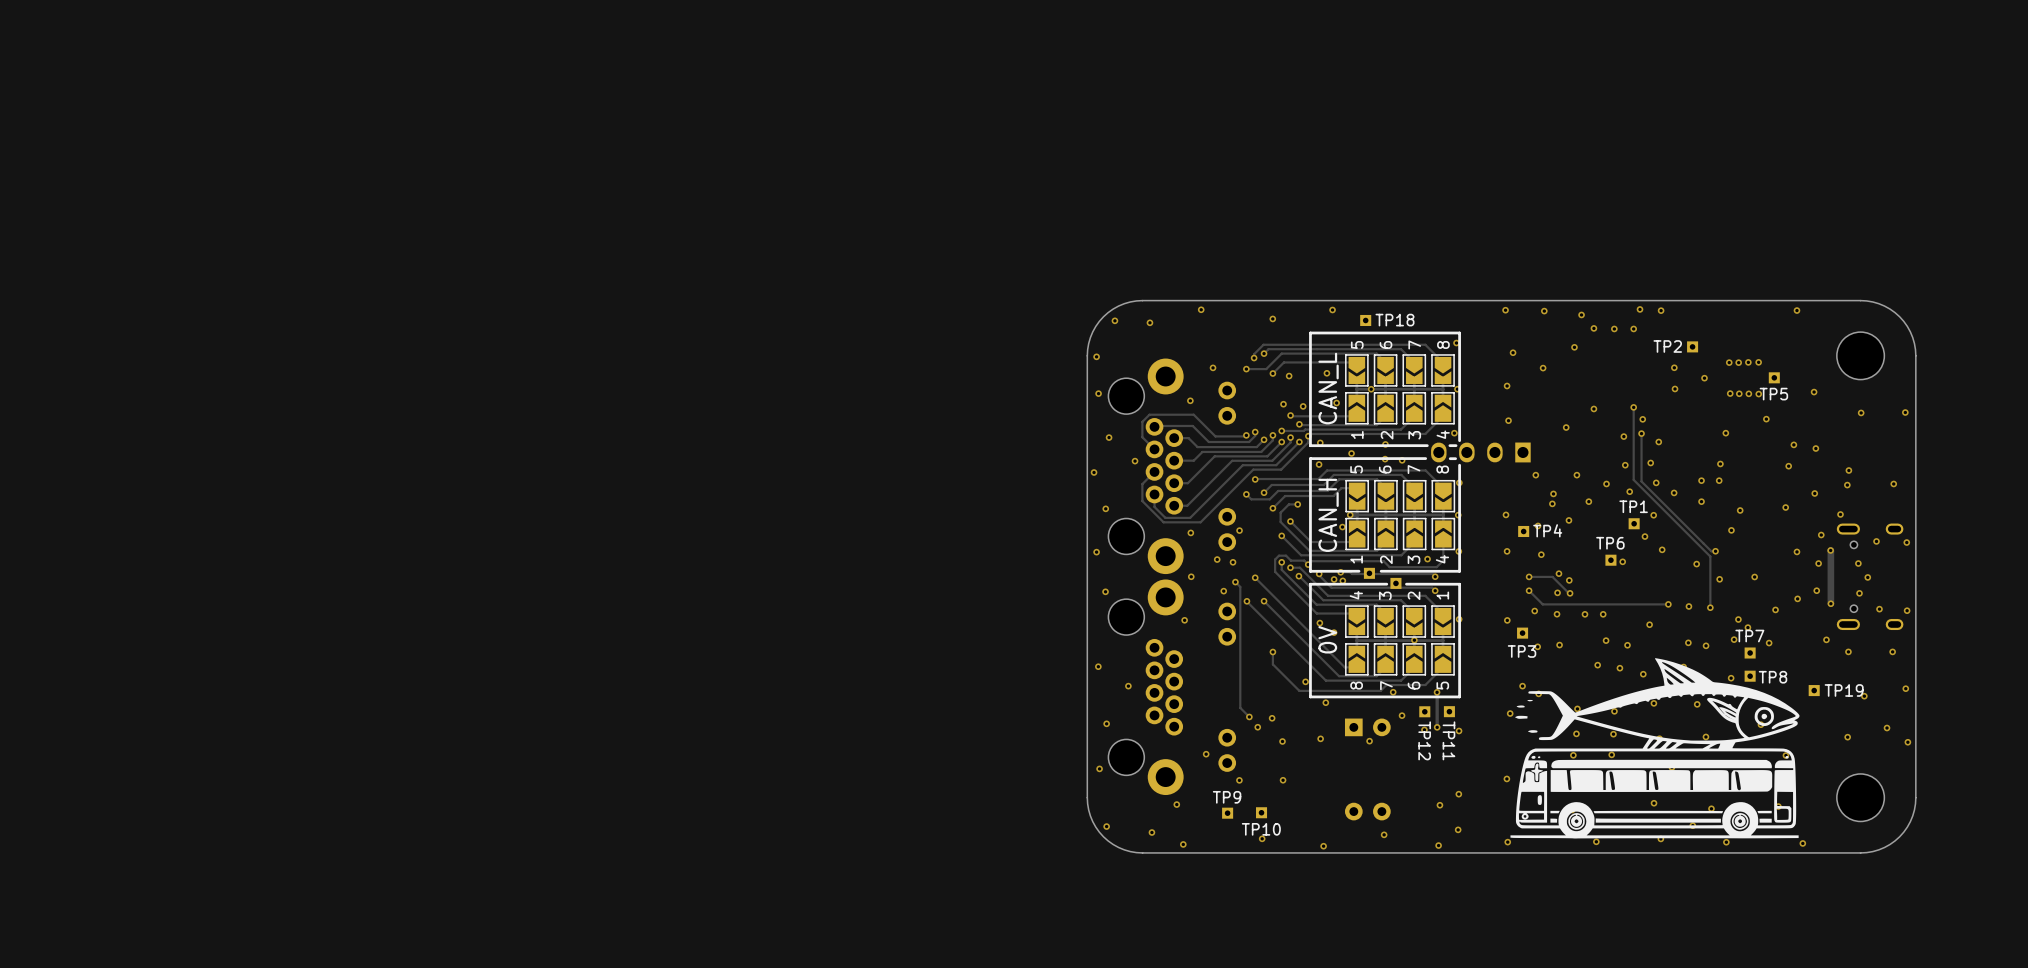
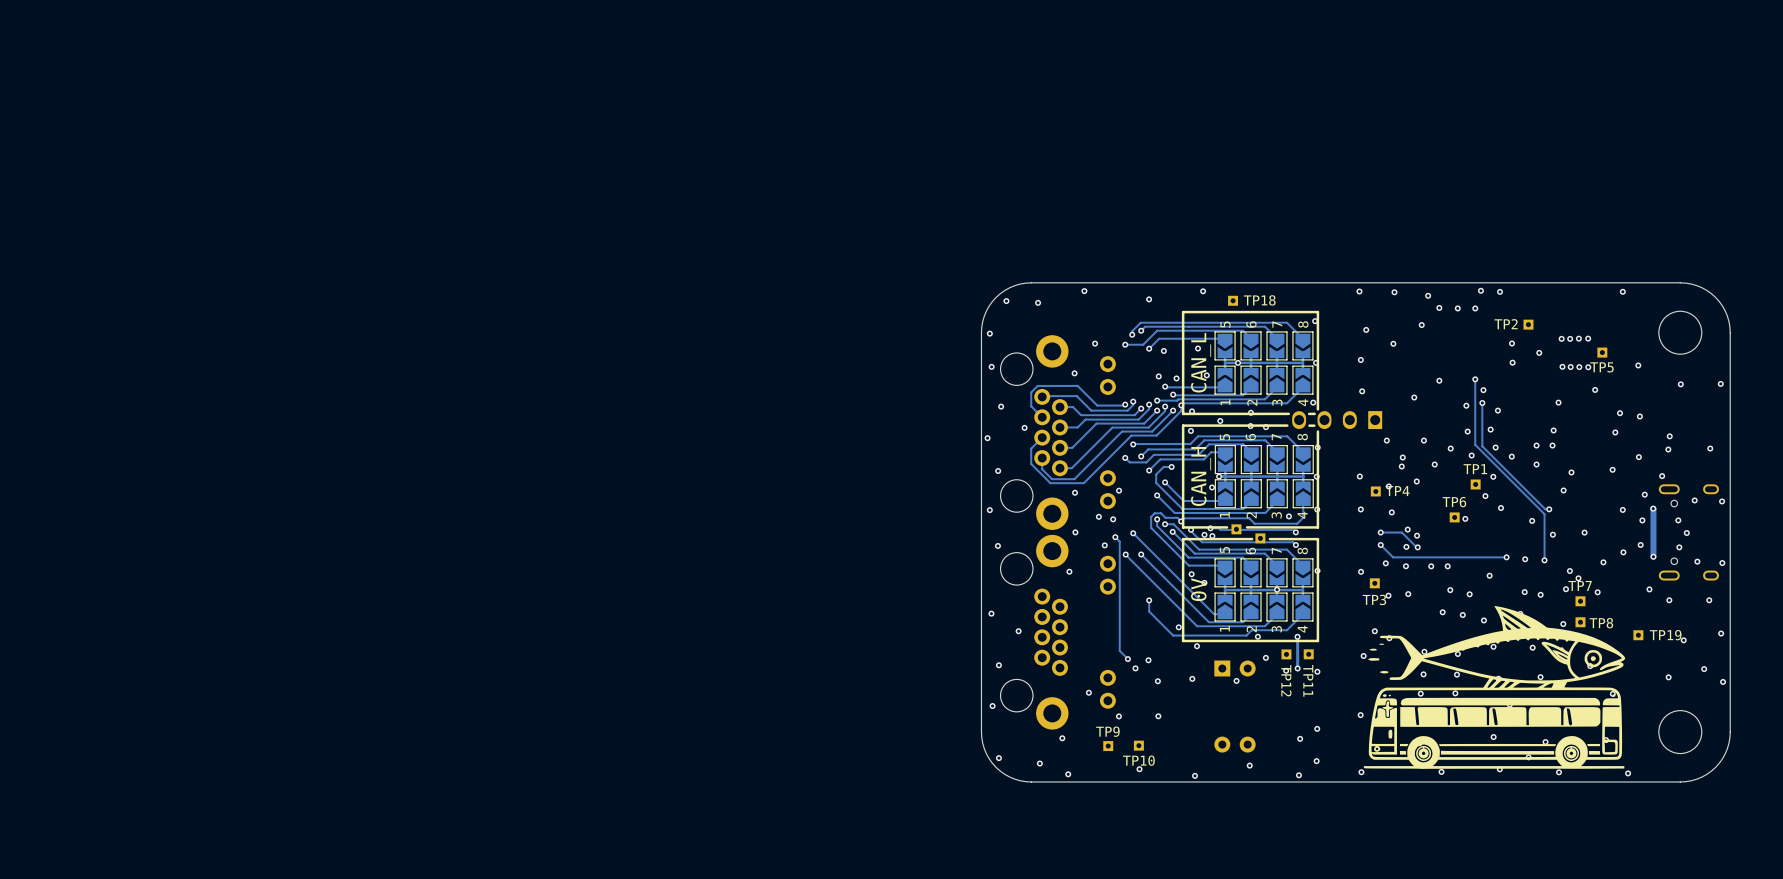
text: 4 (1356, 595) -> 5 (1224, 550)
text: 3 (1385, 595) -> 6 (1250, 550)
text: 2 (1414, 595) -> 7 (1276, 551)
text: 1 (1442, 595) -> 8 (1302, 550)
text: 8 (1356, 685) -> 1 (1224, 628)
text: 7 (1386, 685) -> 2 (1251, 629)
text: 6 (1414, 685) -> 3 (1276, 629)
text: 5 (1442, 685) -> 4 (1302, 629)

